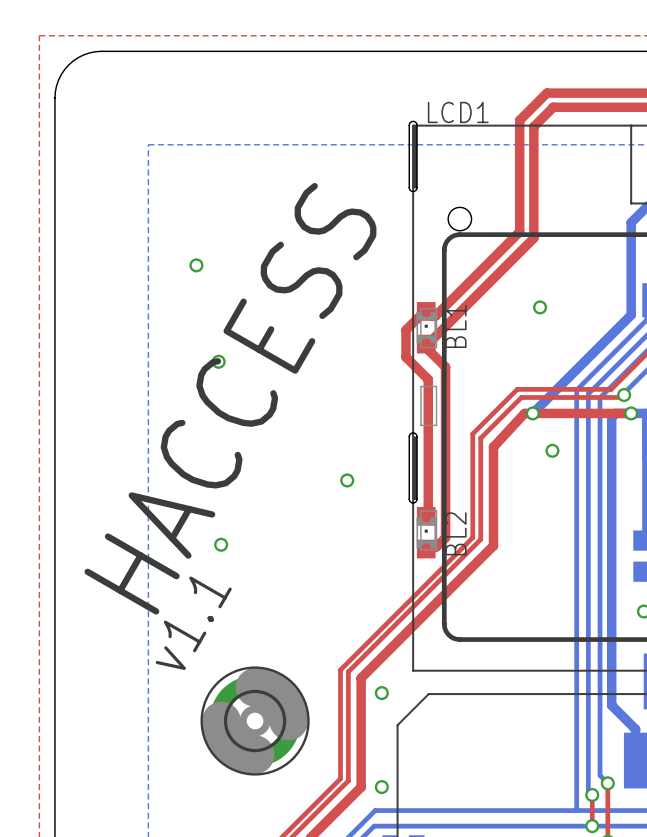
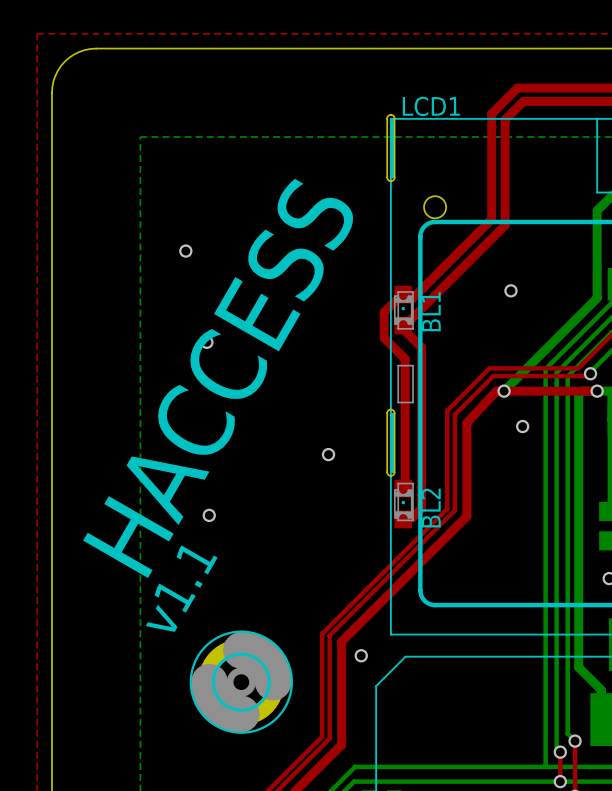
via: (381, 787) -> none

